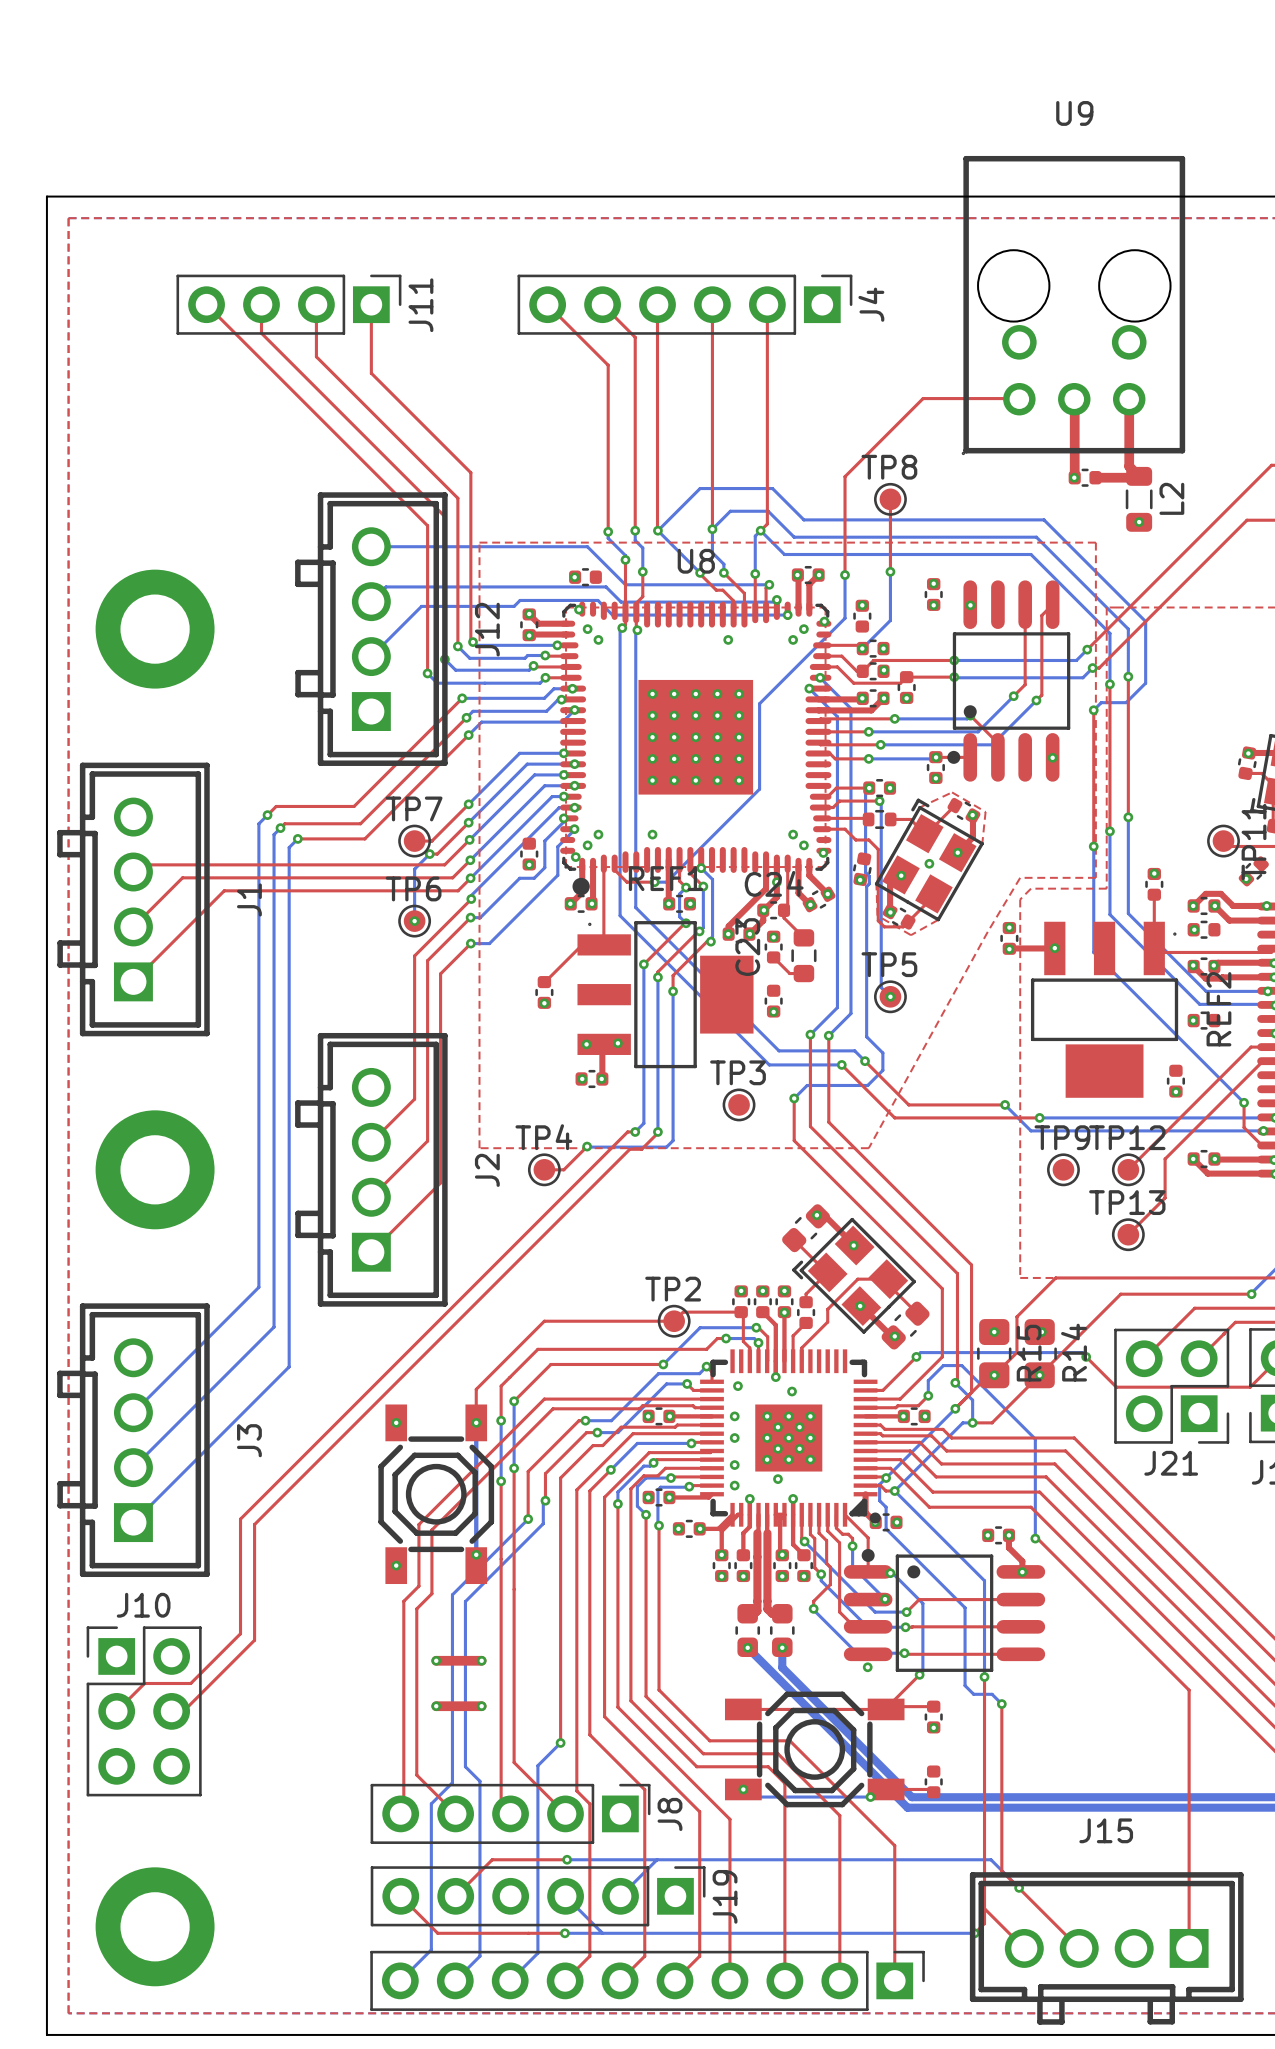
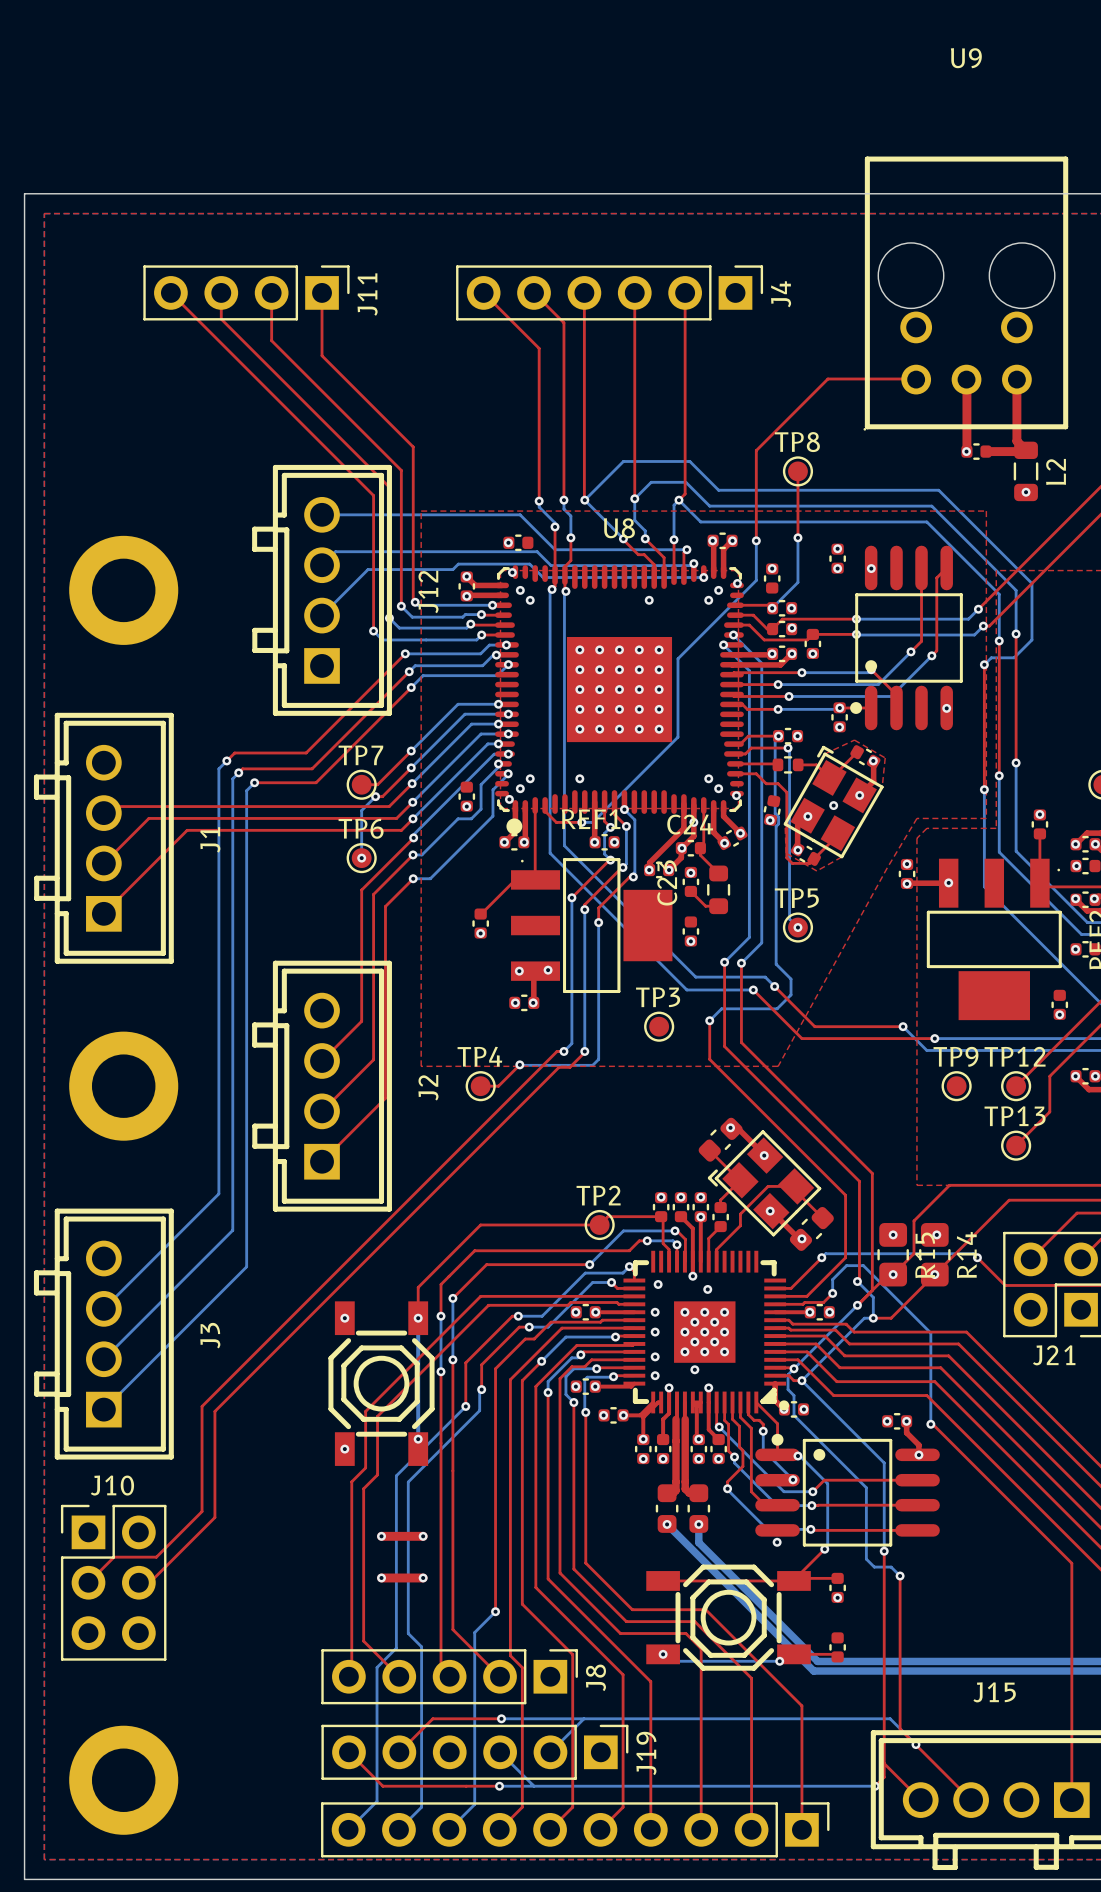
U9 name position: U9 (1074, 113) -> U9 (966, 58)

